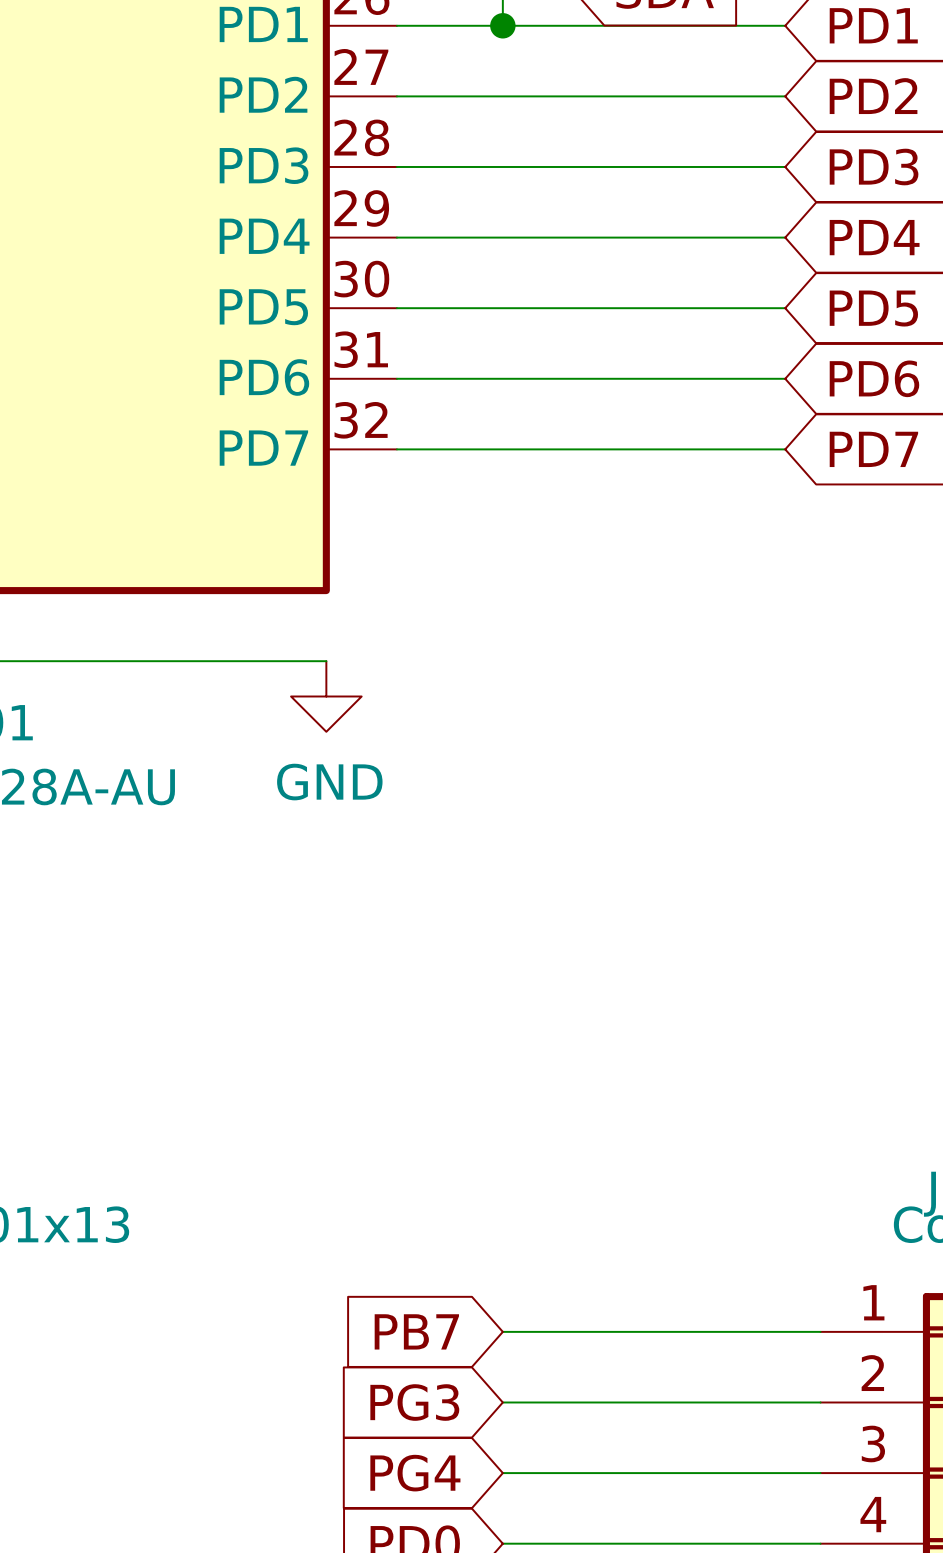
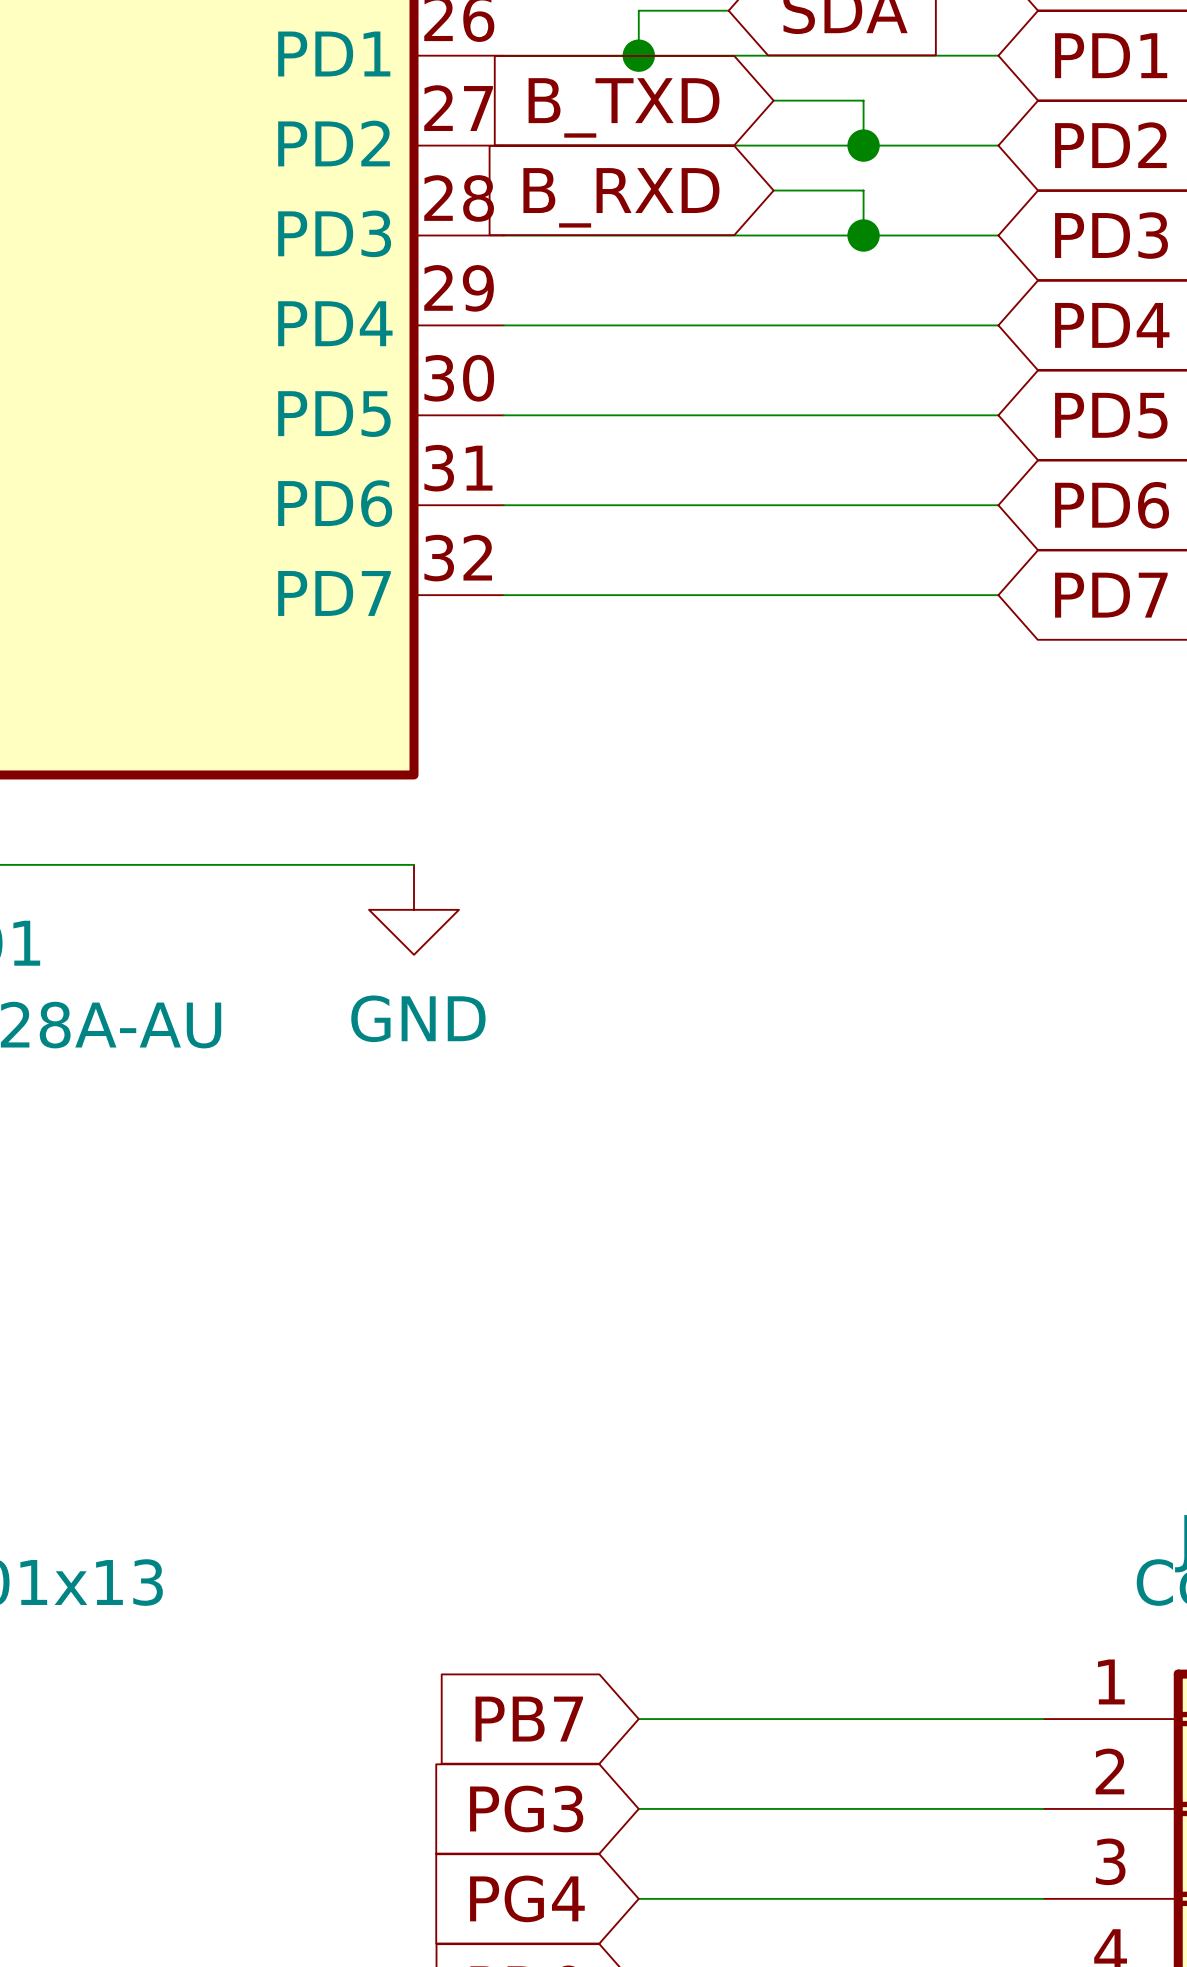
wire: none -> (773, 100) (863, 100) (863, 145)
global label: none -> B_TXD (624, 107)
junction: none -> (863, 145)
wire: none -> (773, 190) (863, 190) (863, 235)
global label: none -> B_RXD (621, 197)
junction: none -> (863, 235)

